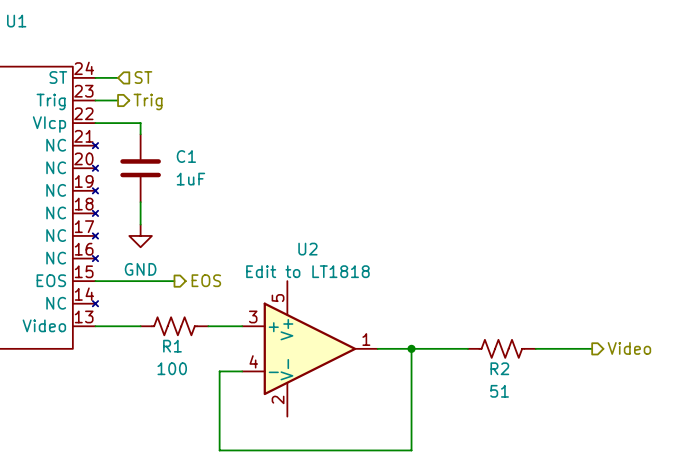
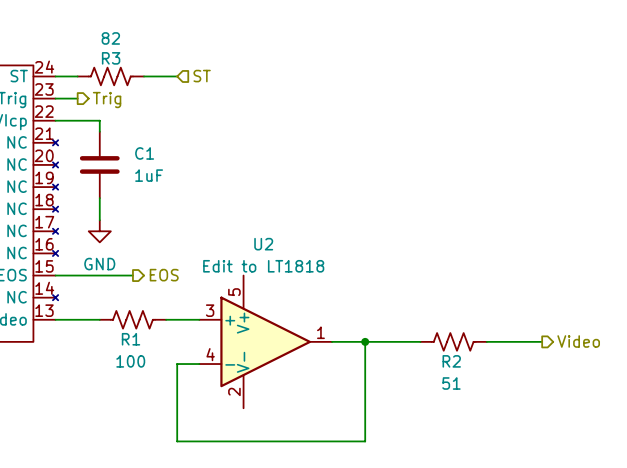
hierarchical label position: ST (143, 77) -> ST (202, 76)
R3: none -> 82 (110, 76)
wire: none -> (144, 76) (177, 76)

